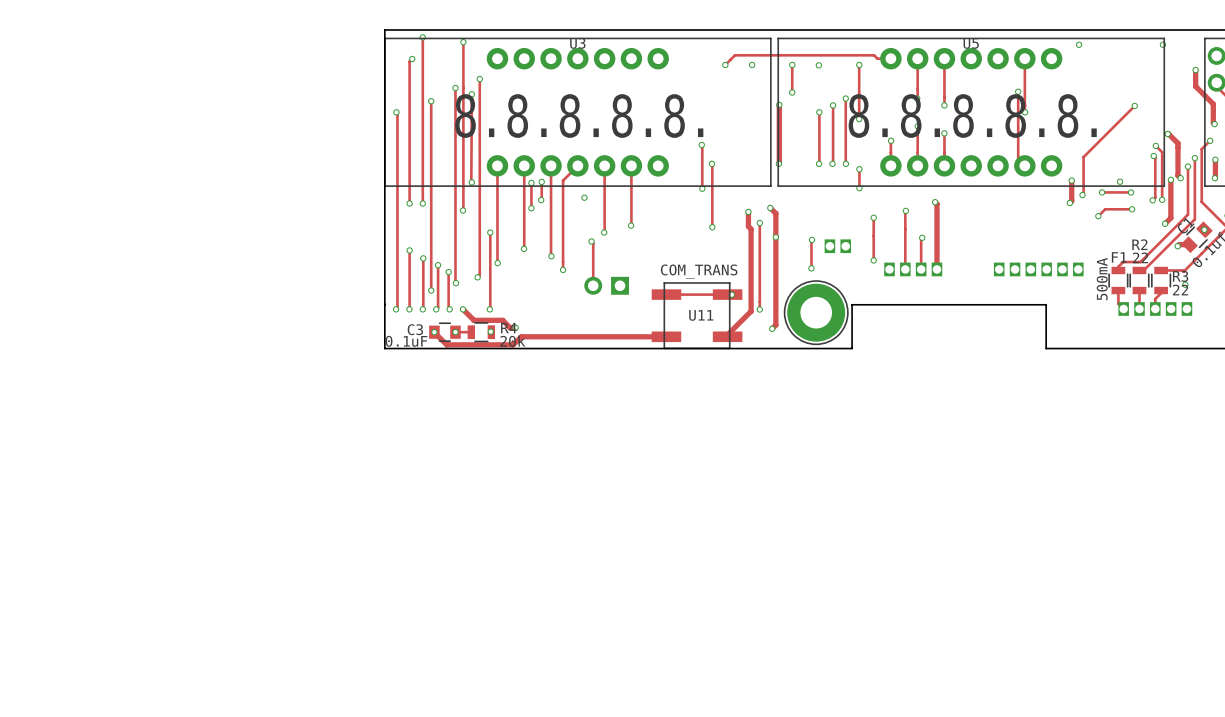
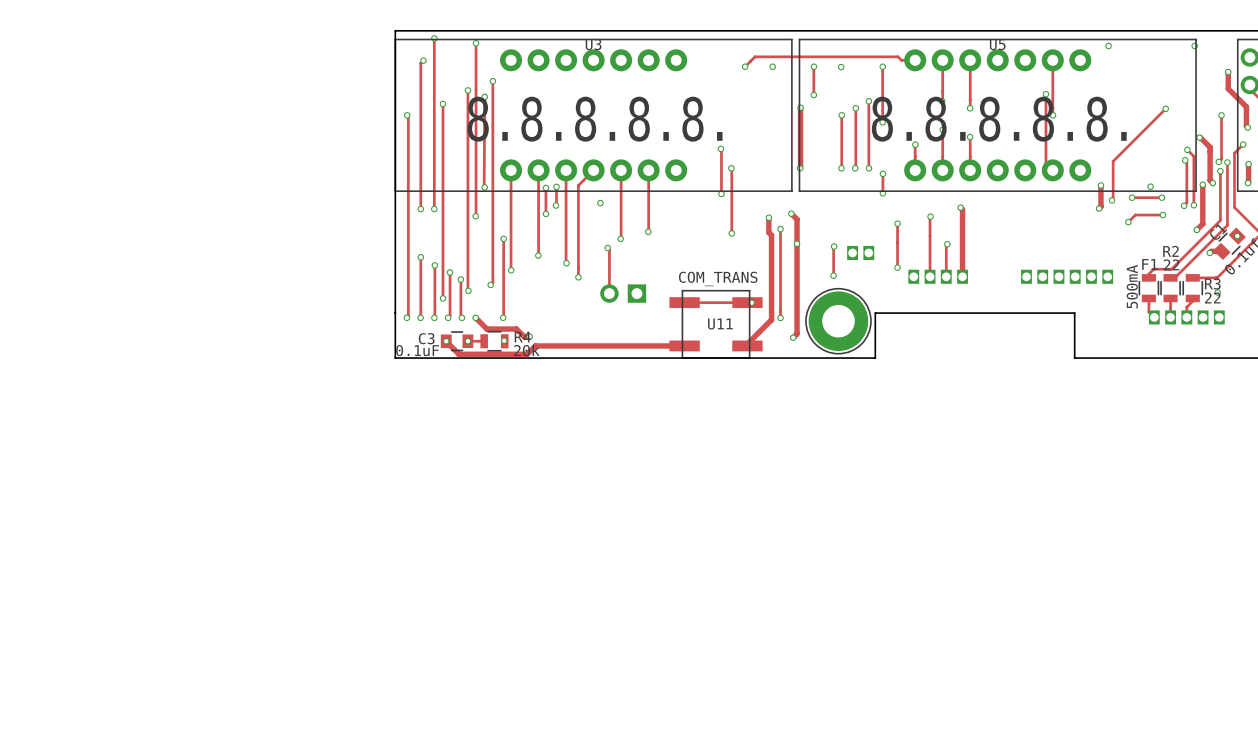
track: none -> (1221, 115) (1221, 159) (1218, 161)
via: none -> (1221, 115)
via: none -> (1218, 161)

